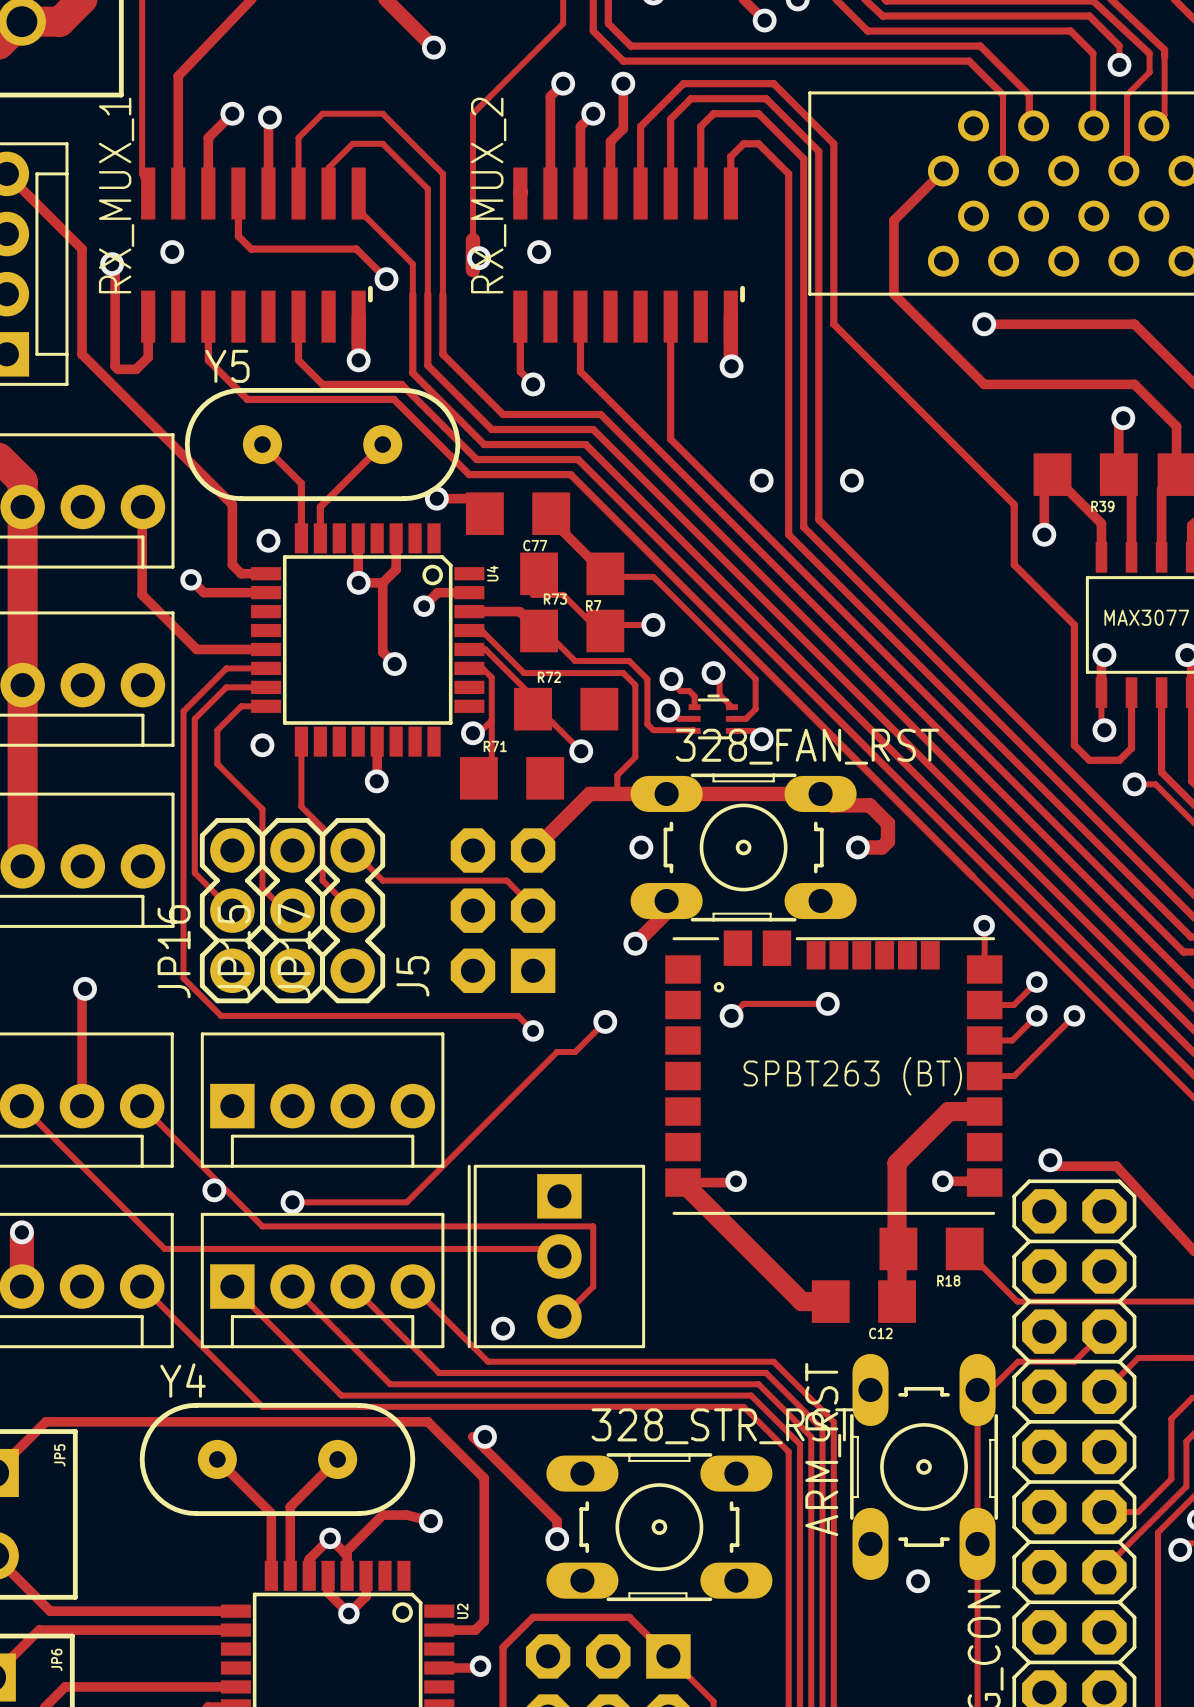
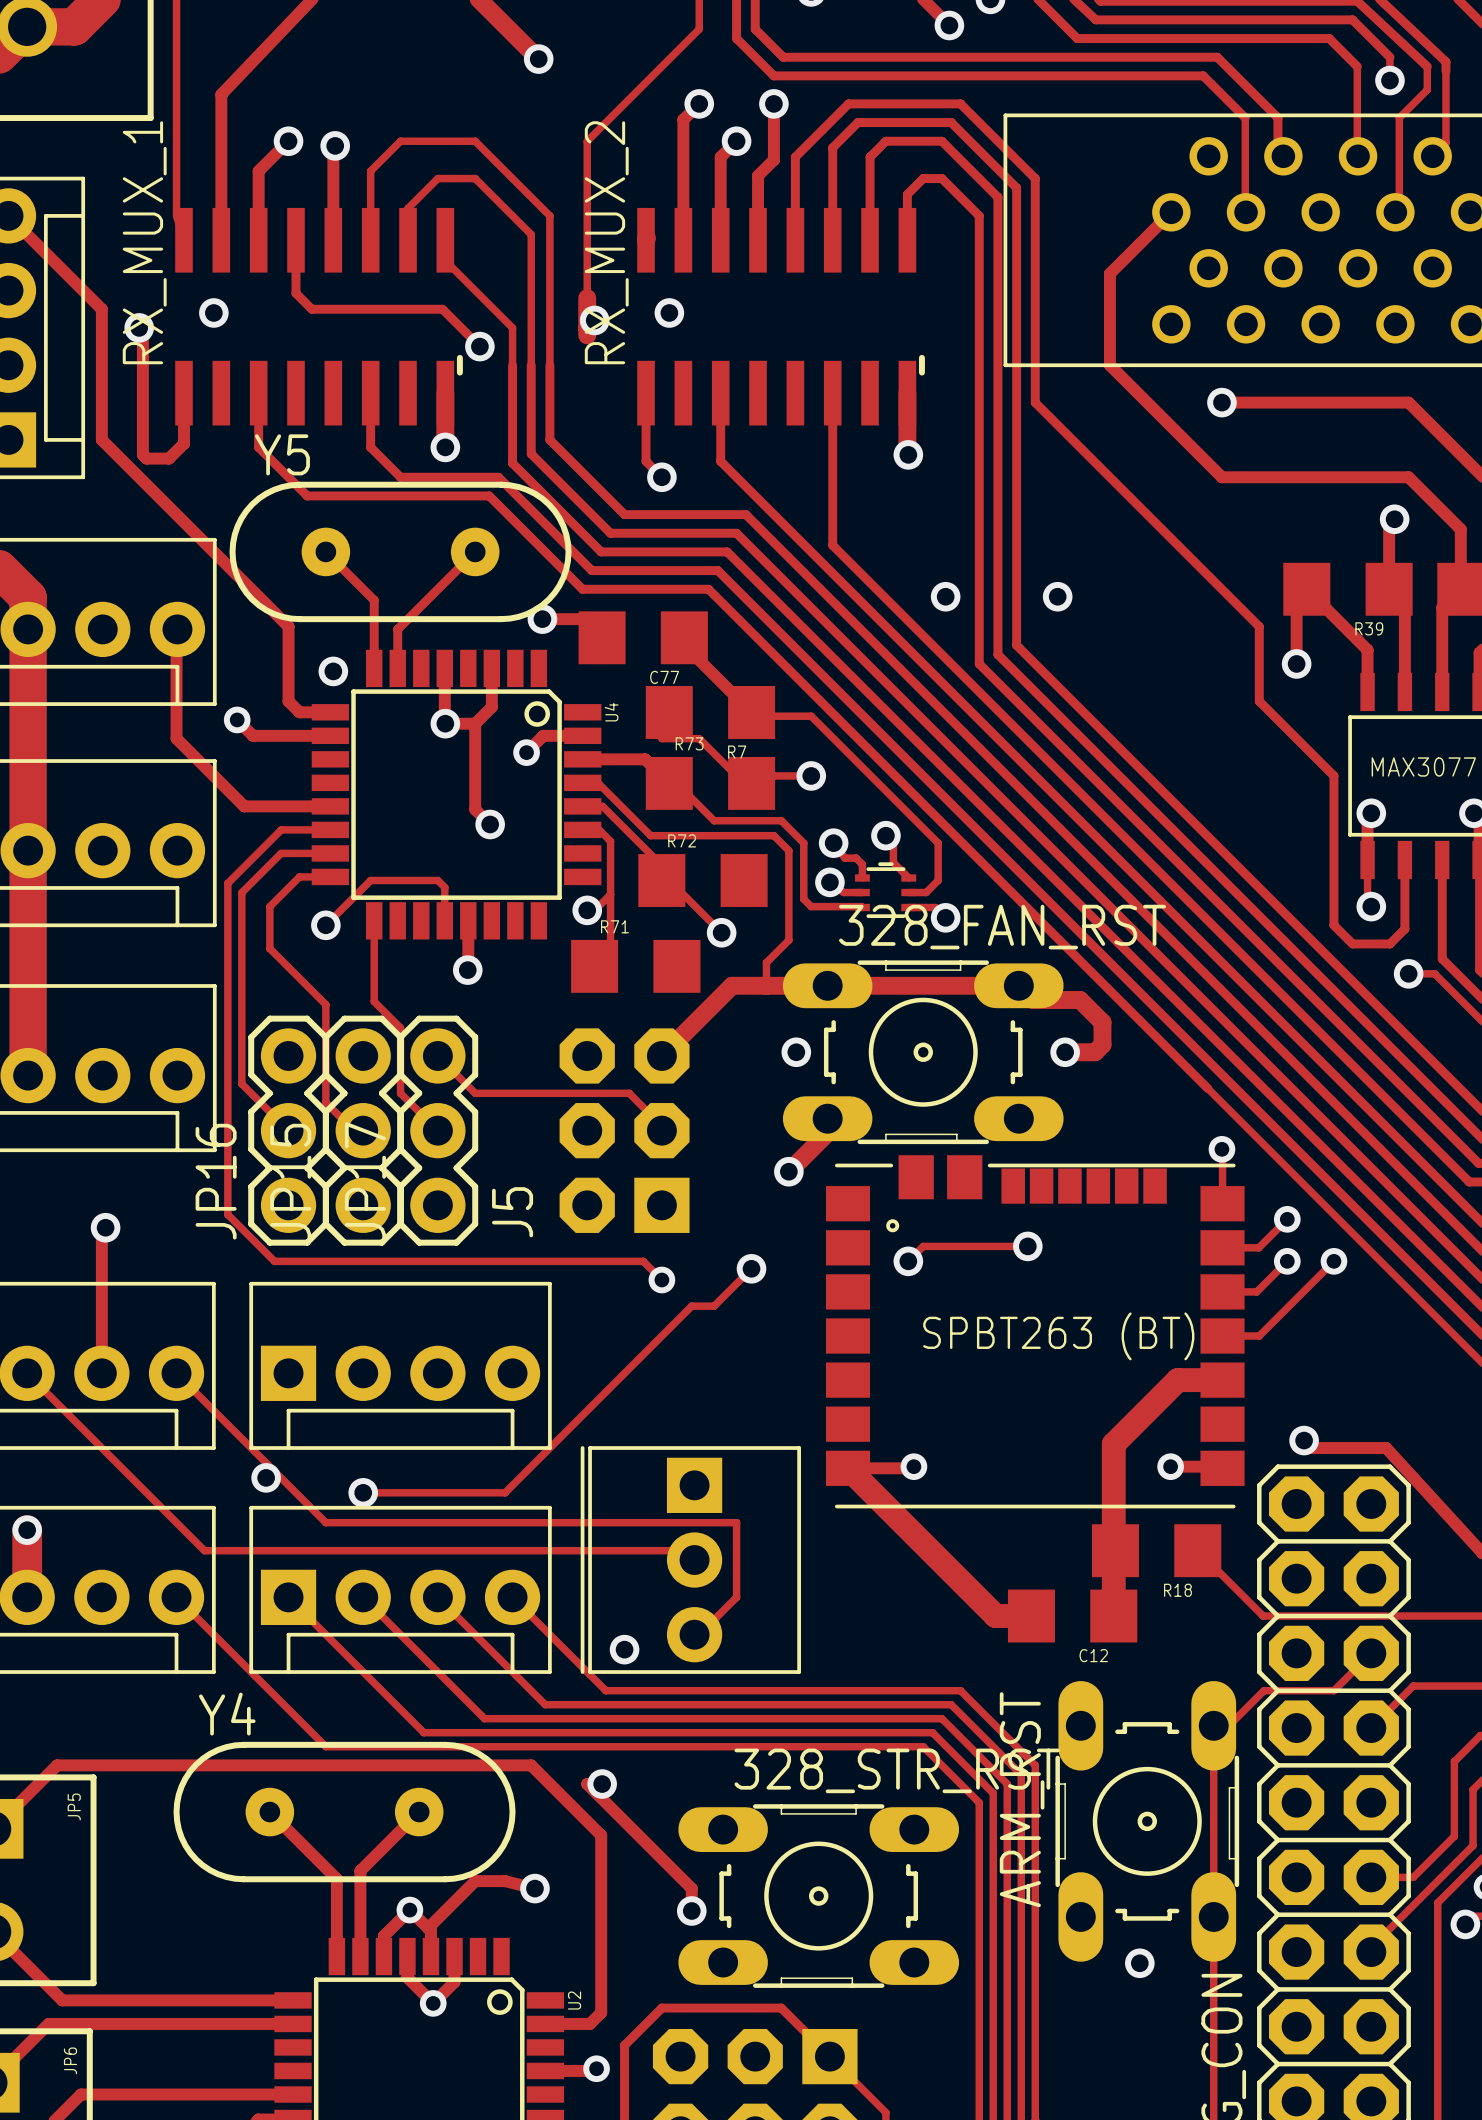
track: none -> (444, 920) (444, 887) (437, 880) (370, 880) (325, 925)

